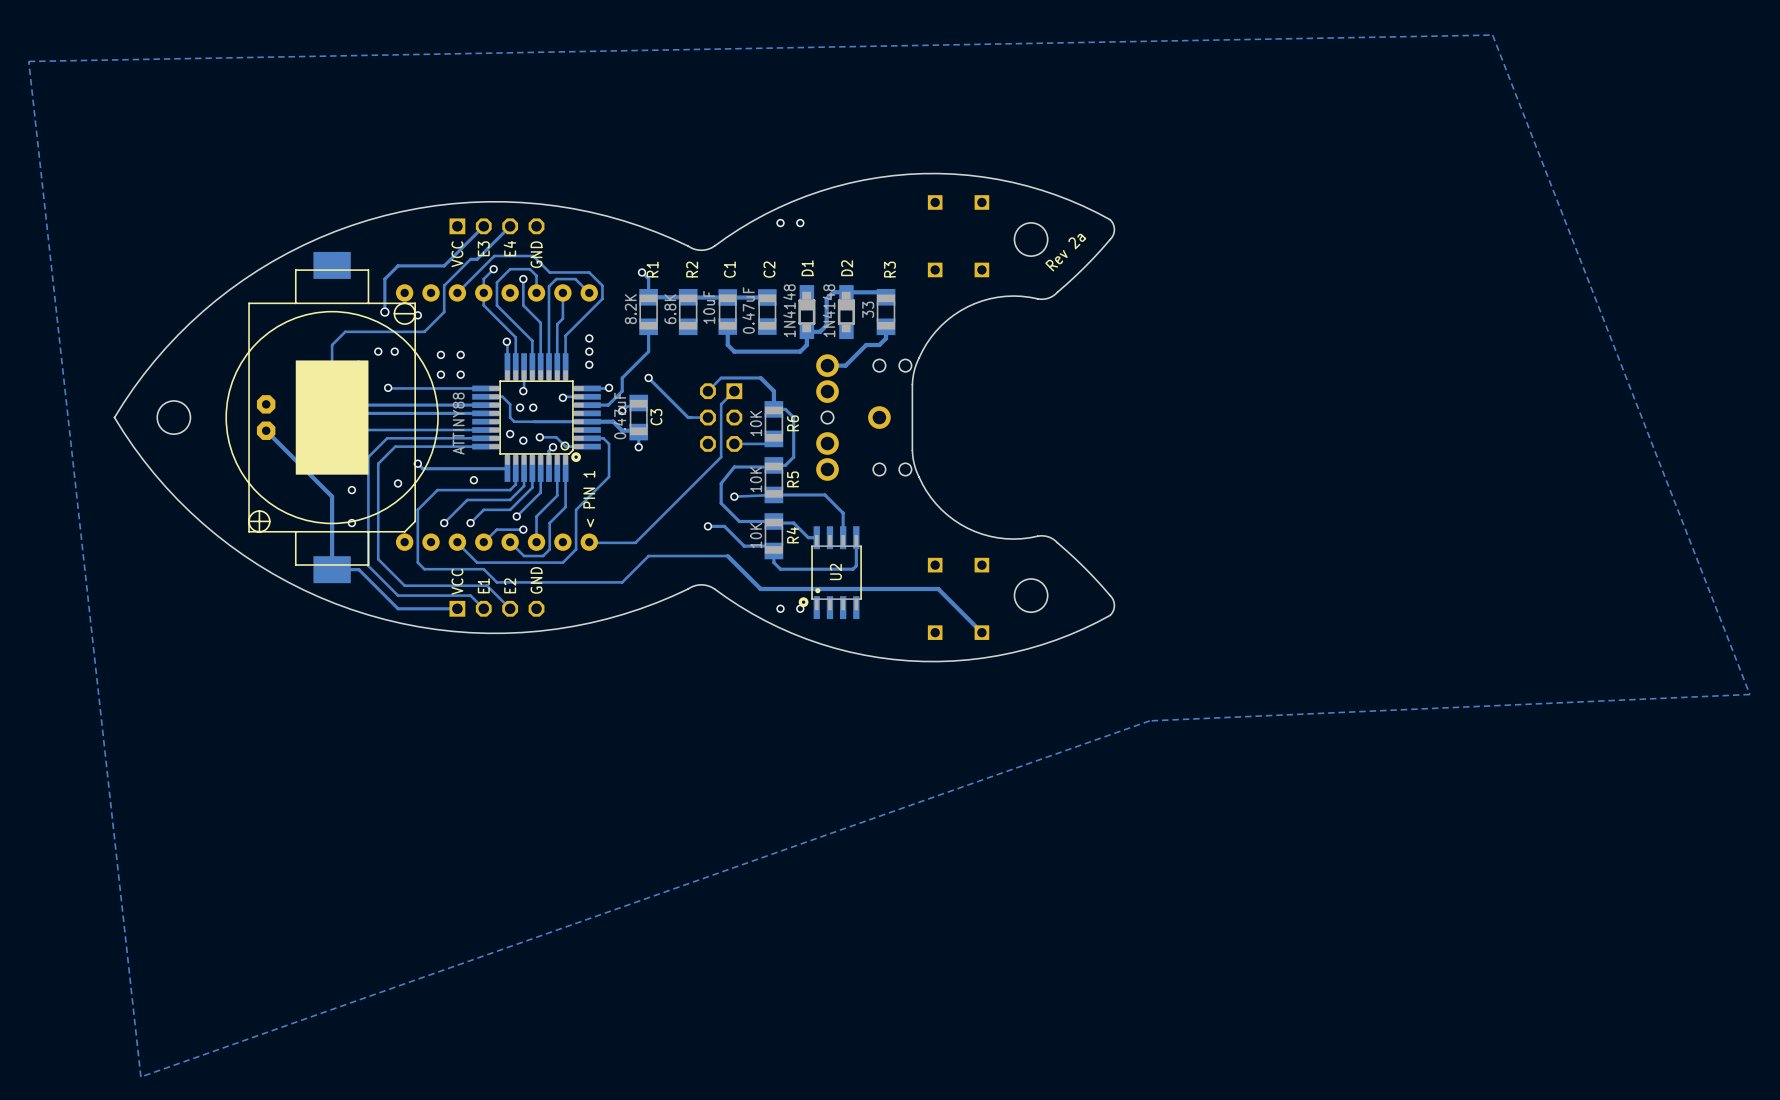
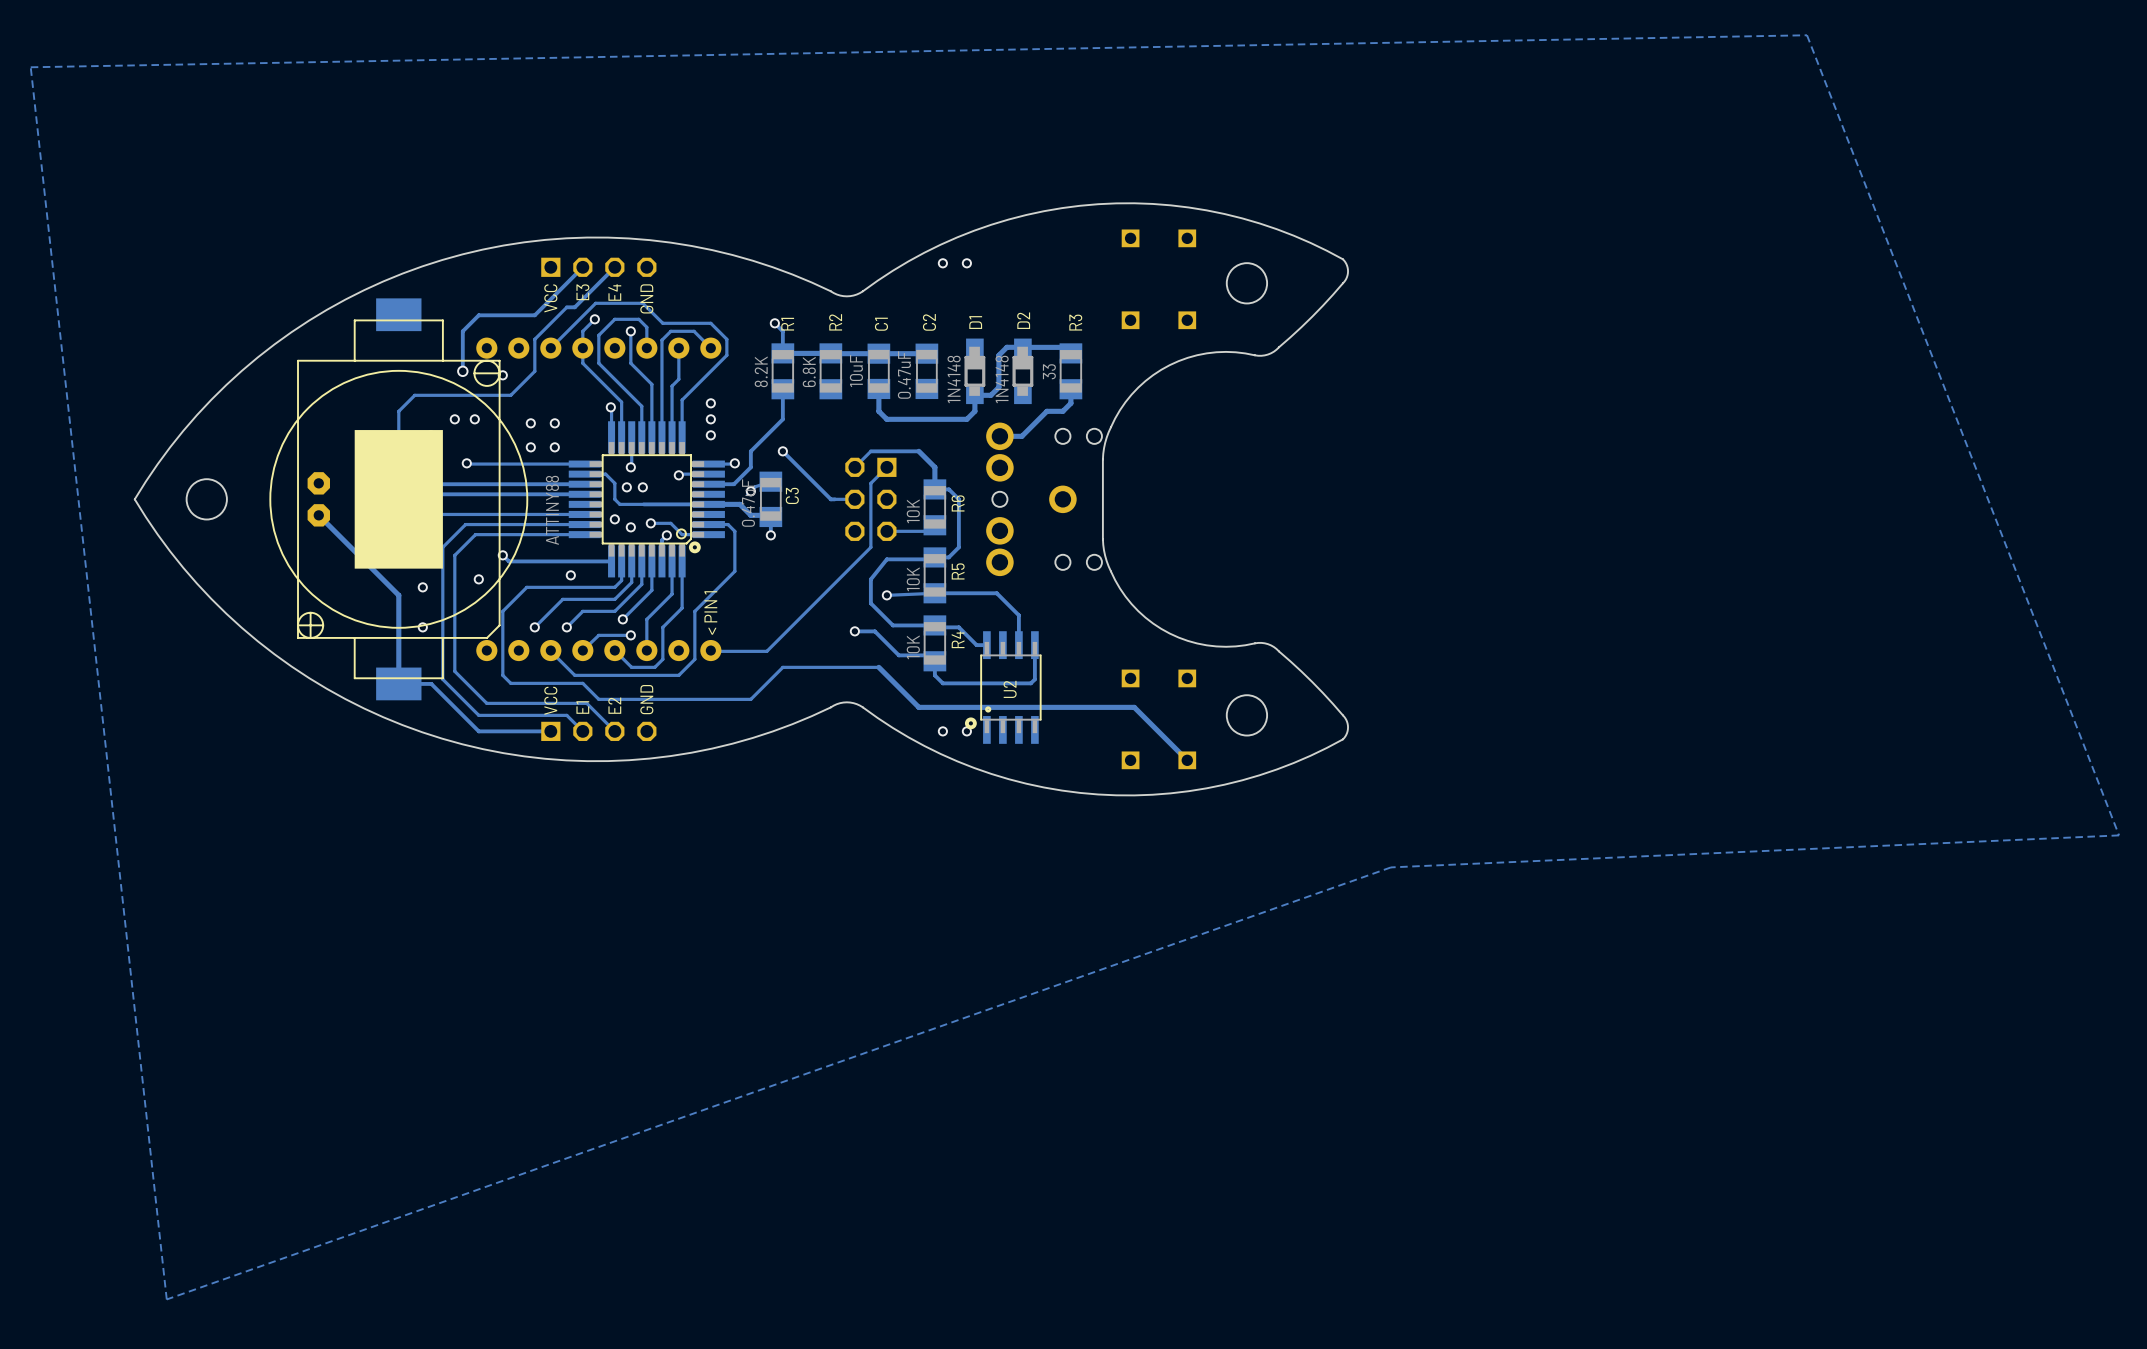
text: Rev 2a (1065, 252) -> none

